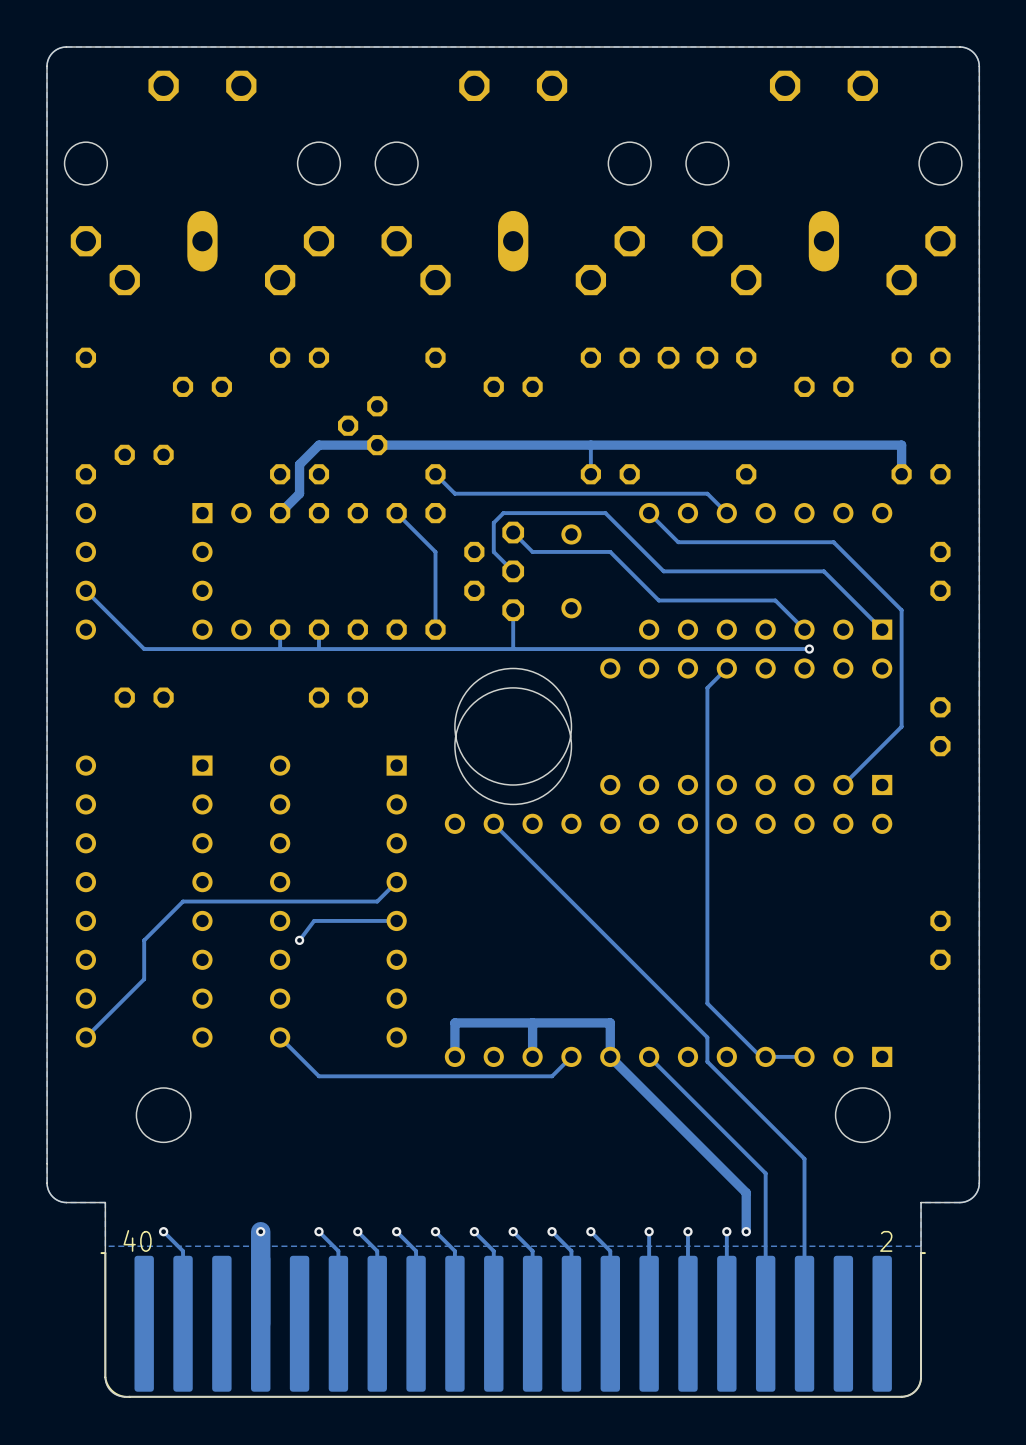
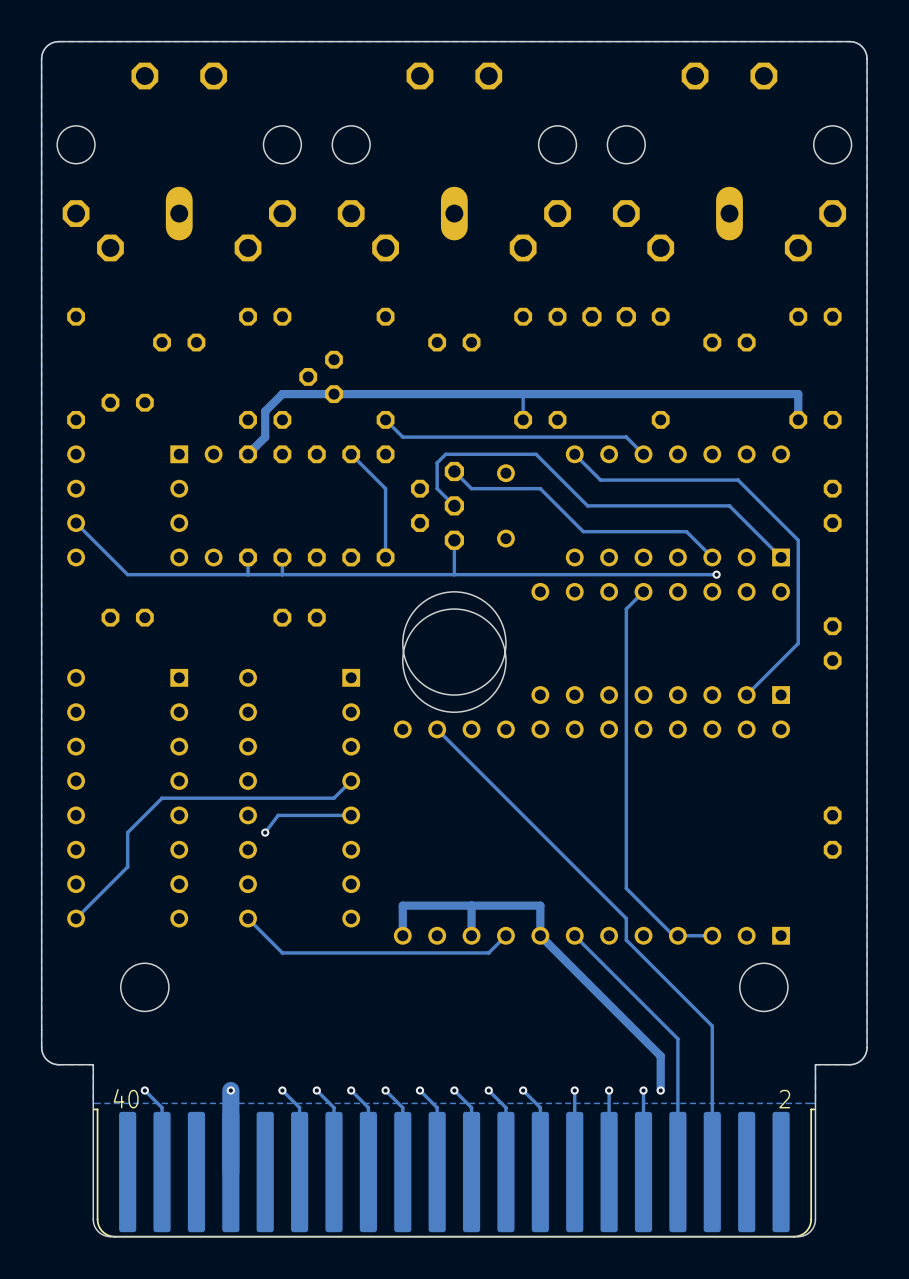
part footprint: [100, 1252, 926, 1398] -> [93, 1108, 816, 1238]

